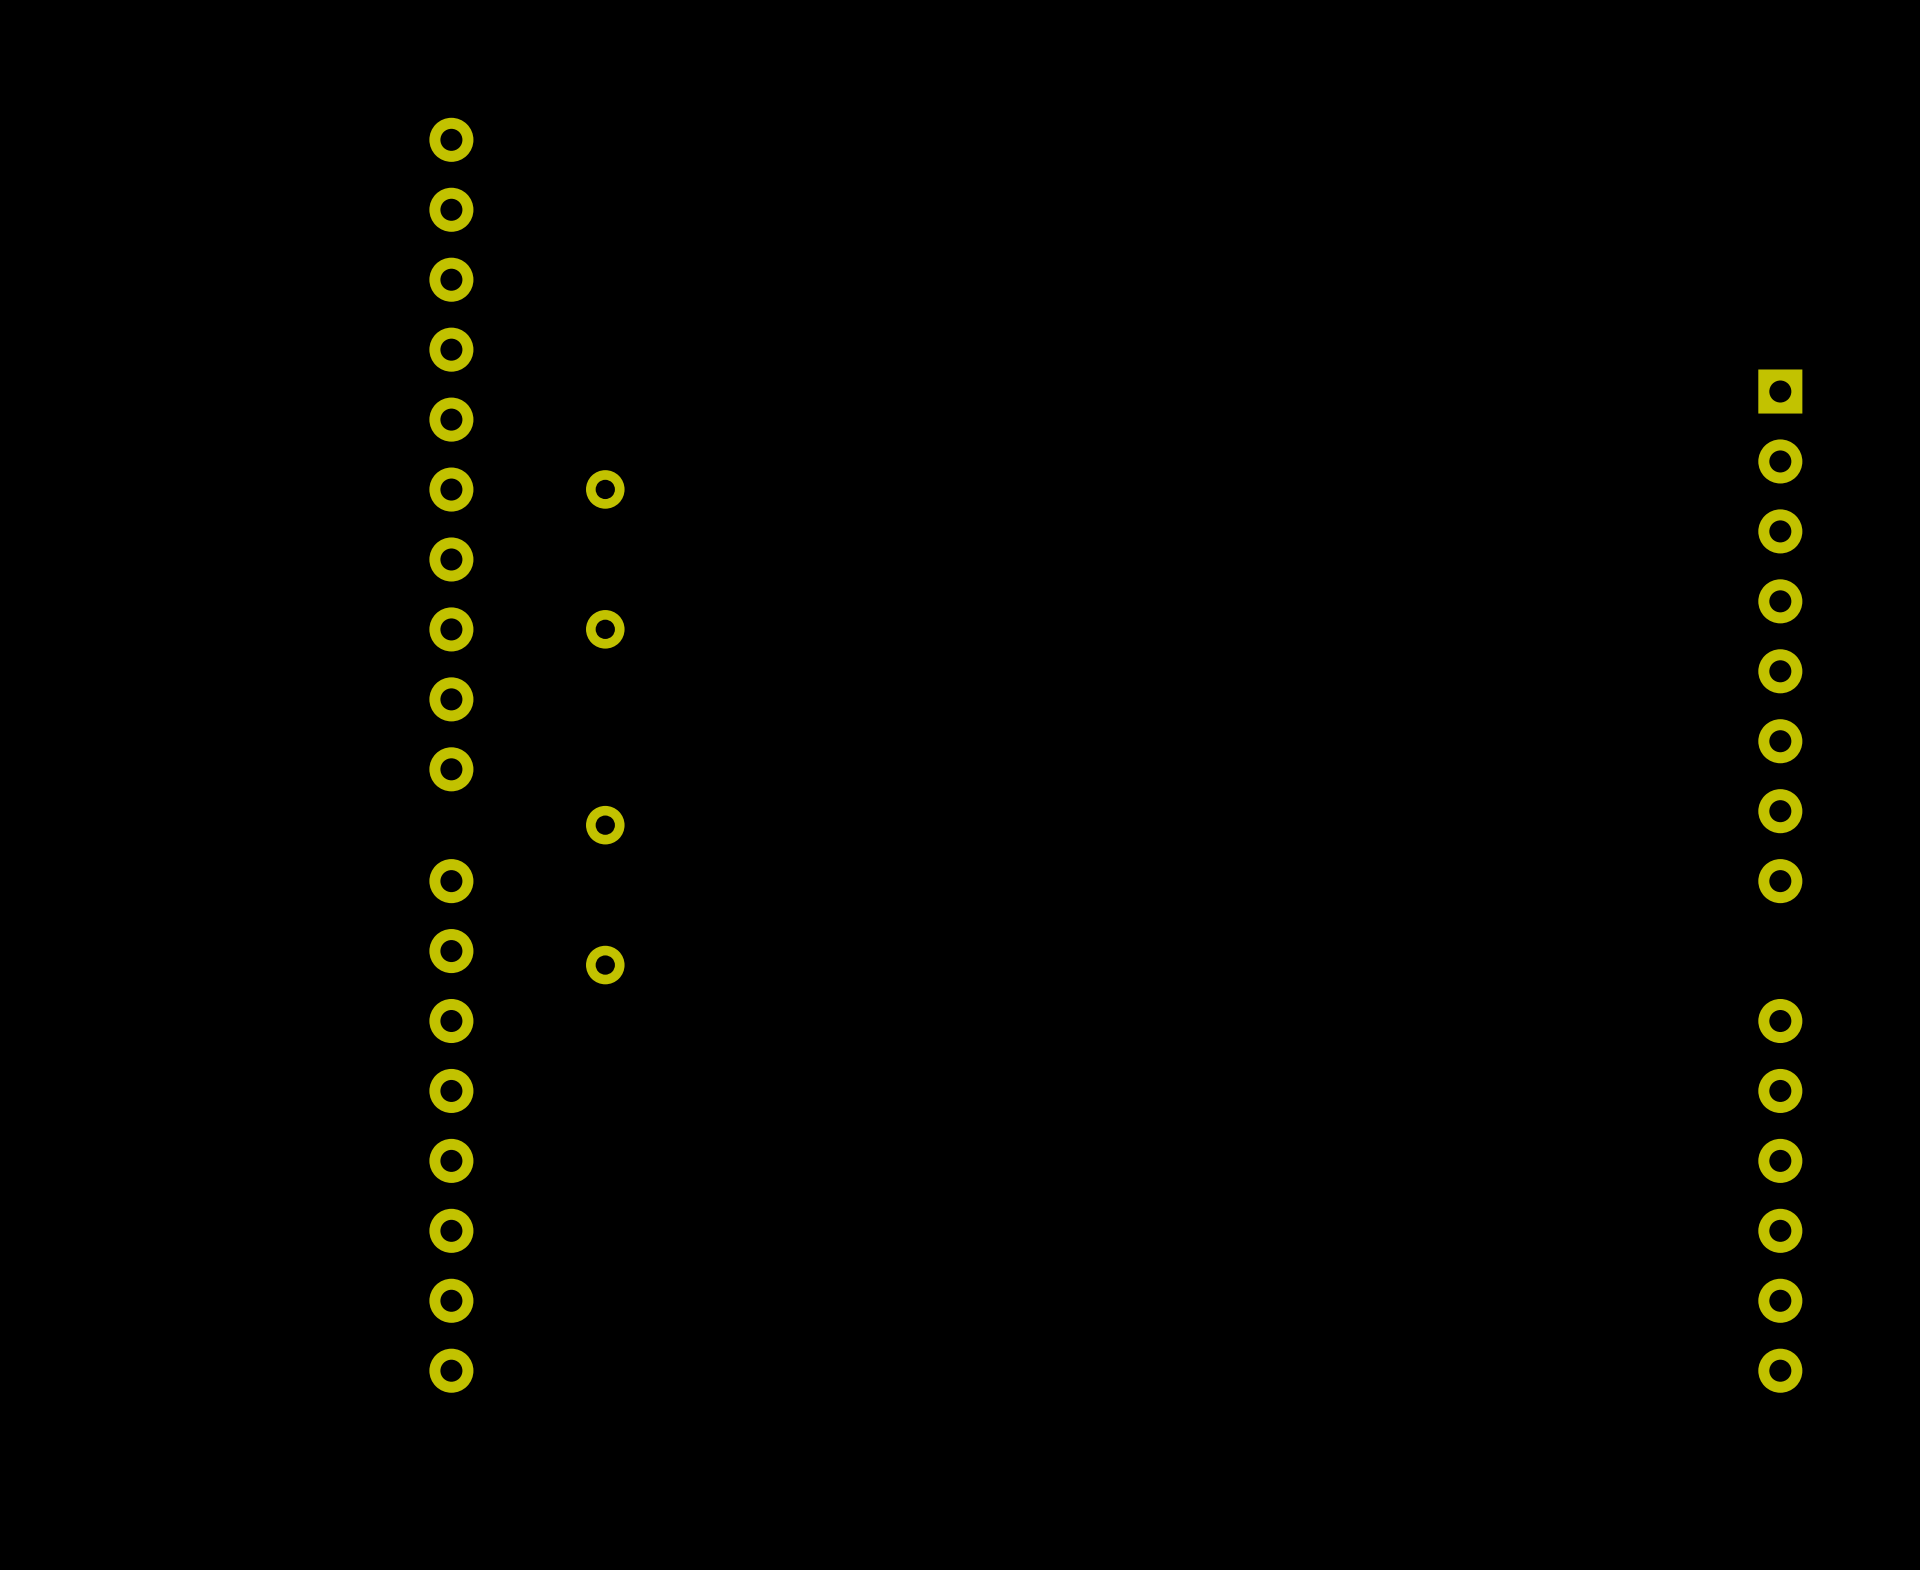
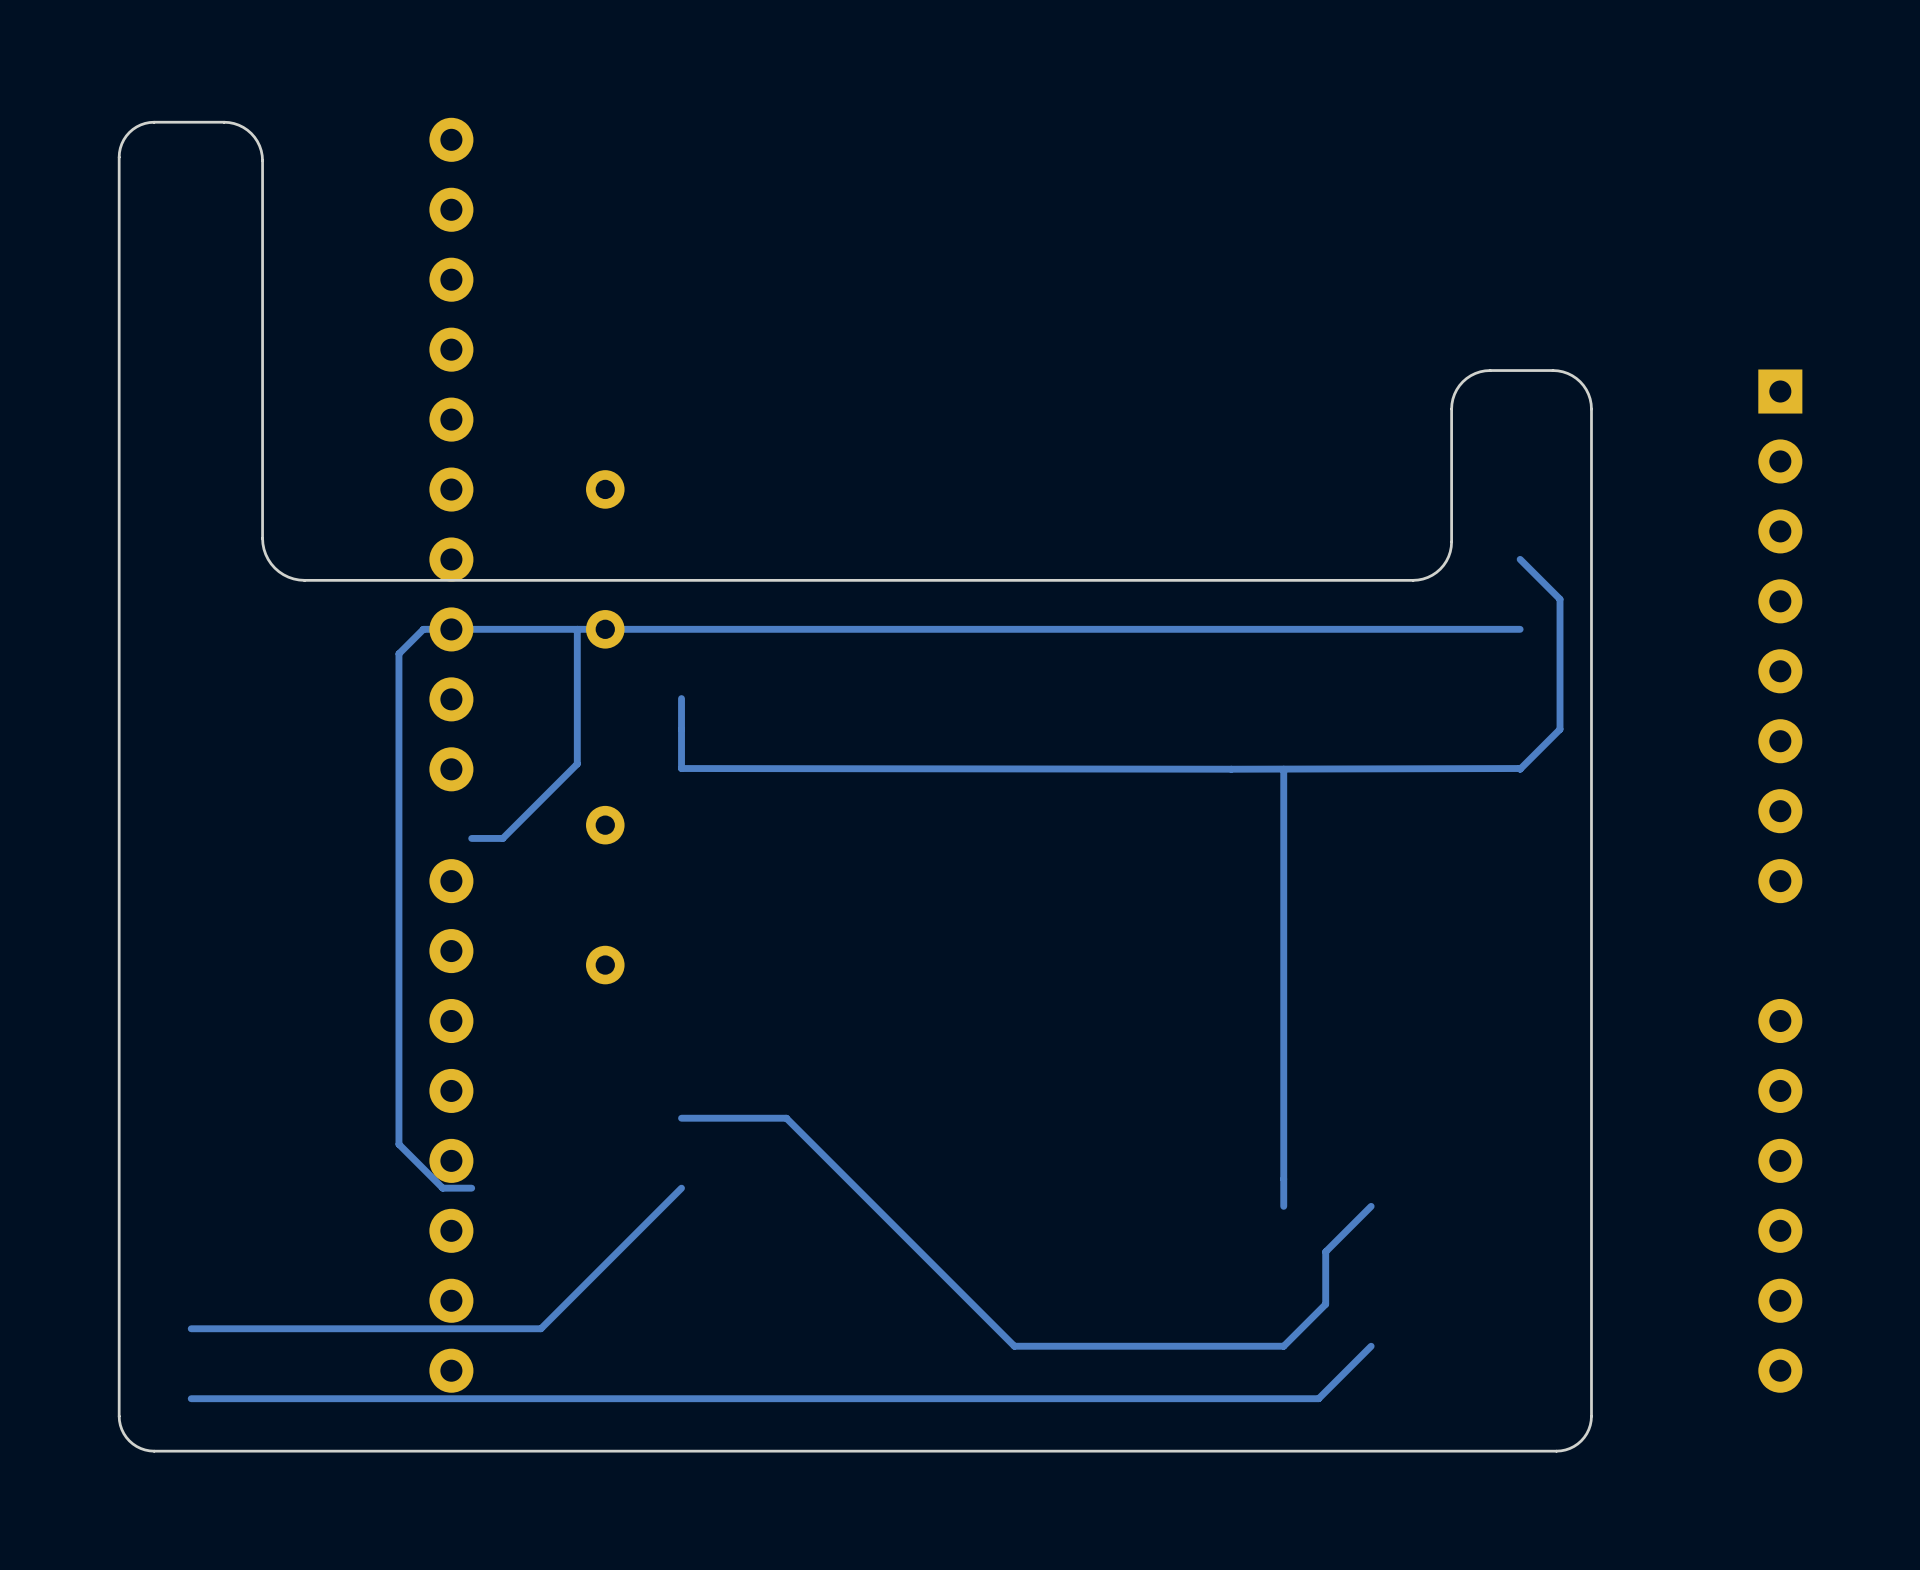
board edge: none -> (154, 122) (140, 124) (129, 132) (121, 143) (119, 157) (119, 1416) (121, 1429) (129, 1440) (140, 1448) (154, 1451) (1556, 1451) (1569, 1448) (1581, 1440) (1588, 1429) (1591, 1416) (1591, 409) (1588, 394) (1580, 381) (1567, 373) (1558, 370) (1490, 370) (1470, 375) (1459, 385) (1454, 394) (1451, 409) (1450, 551) (1443, 565) (1436, 572) (1418, 580) (299, 580) (288, 577) (274, 568) (265, 554) (262, 543) (261, 150) (251, 133) (234, 123) (154, 122)
track: none -> (1520, 559) (1560, 599) (1560, 729) (1520, 769) (681, 768) (681, 698)
track: none -> (577, 629) (577, 763) (502, 838) (471, 838)
track: none -> (1520, 629) (423, 629) (398, 653) (398, 1144) (442, 1188) (471, 1188)
track: none -> (1283, 769) (1283, 1206)
track: none -> (681, 1118) (786, 1118) (1014, 1346) (1283, 1346) (1325, 1304) (1325, 1251) (1371, 1206)
track: none -> (681, 1188) (540, 1328) (191, 1328)
track: none -> (1371, 1346) (1318, 1398) (191, 1398)

